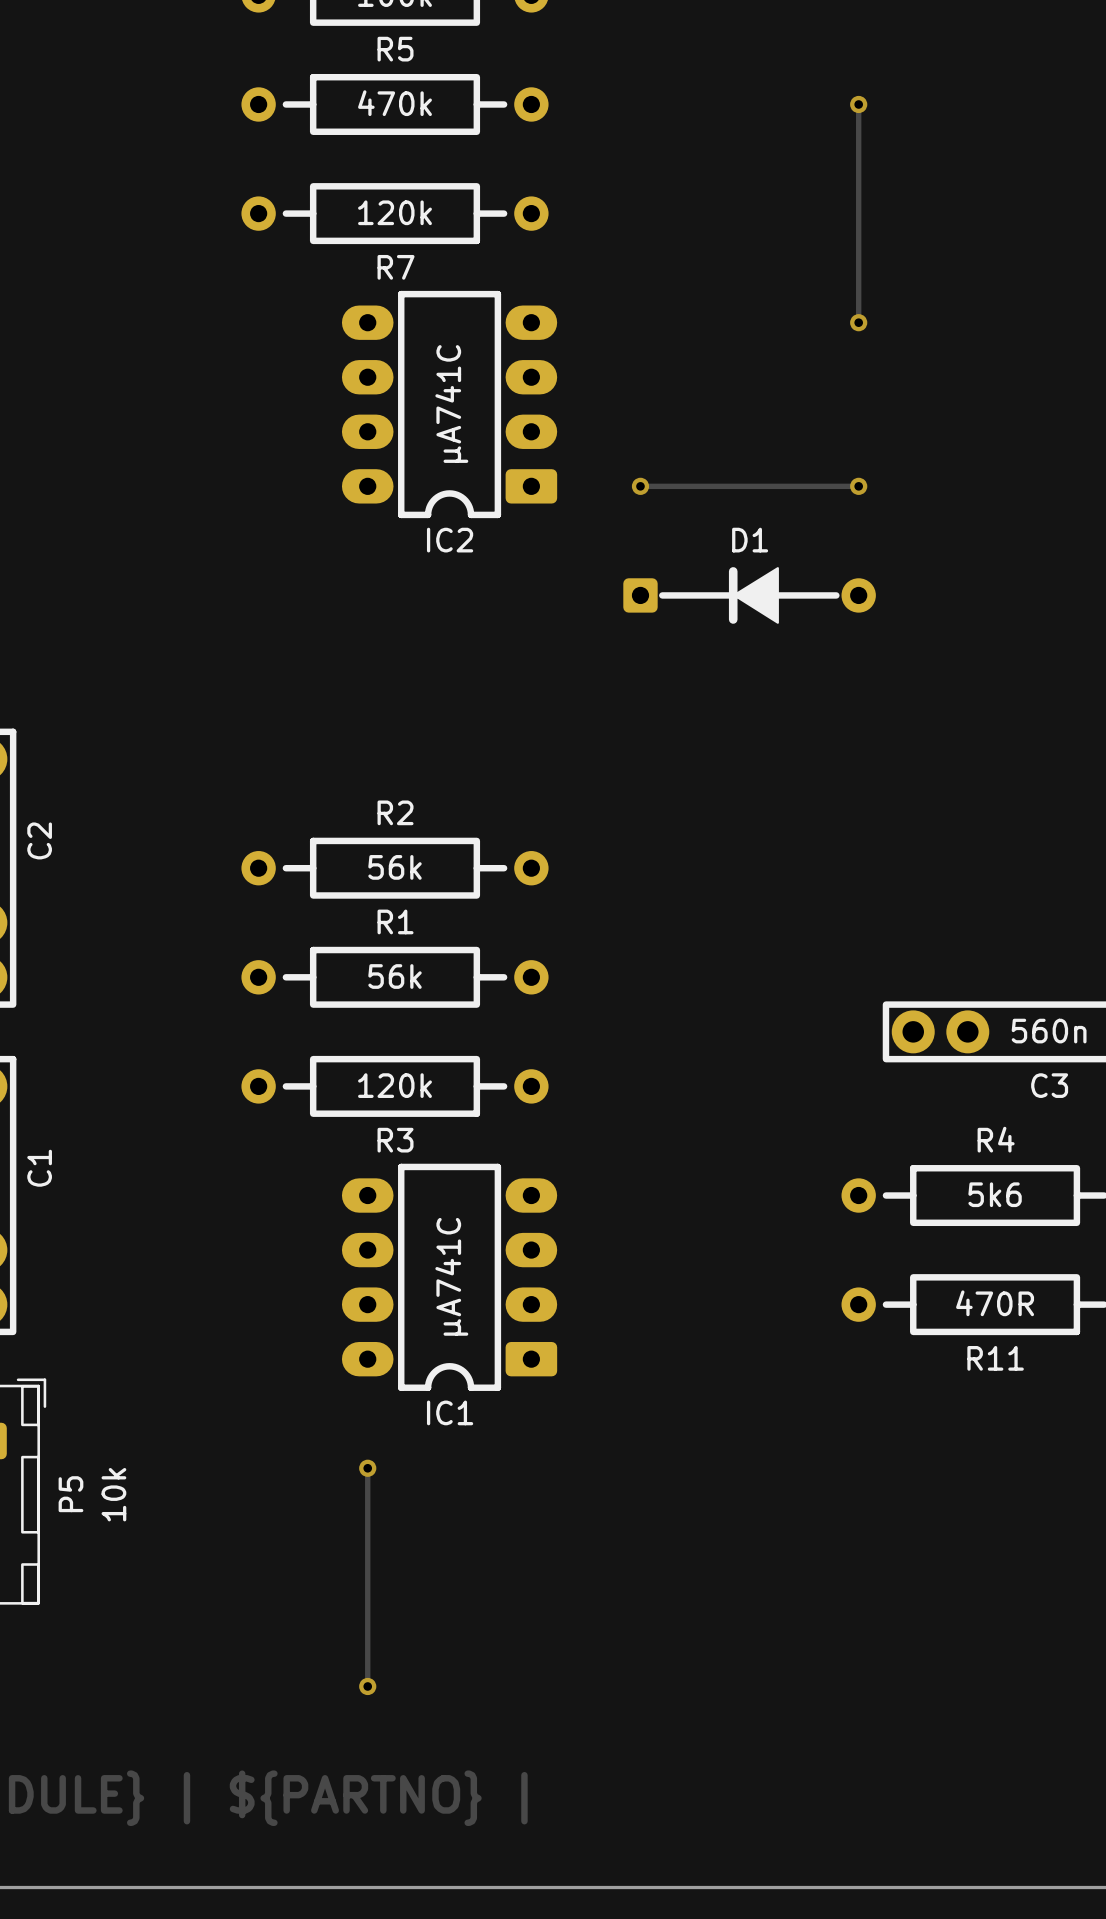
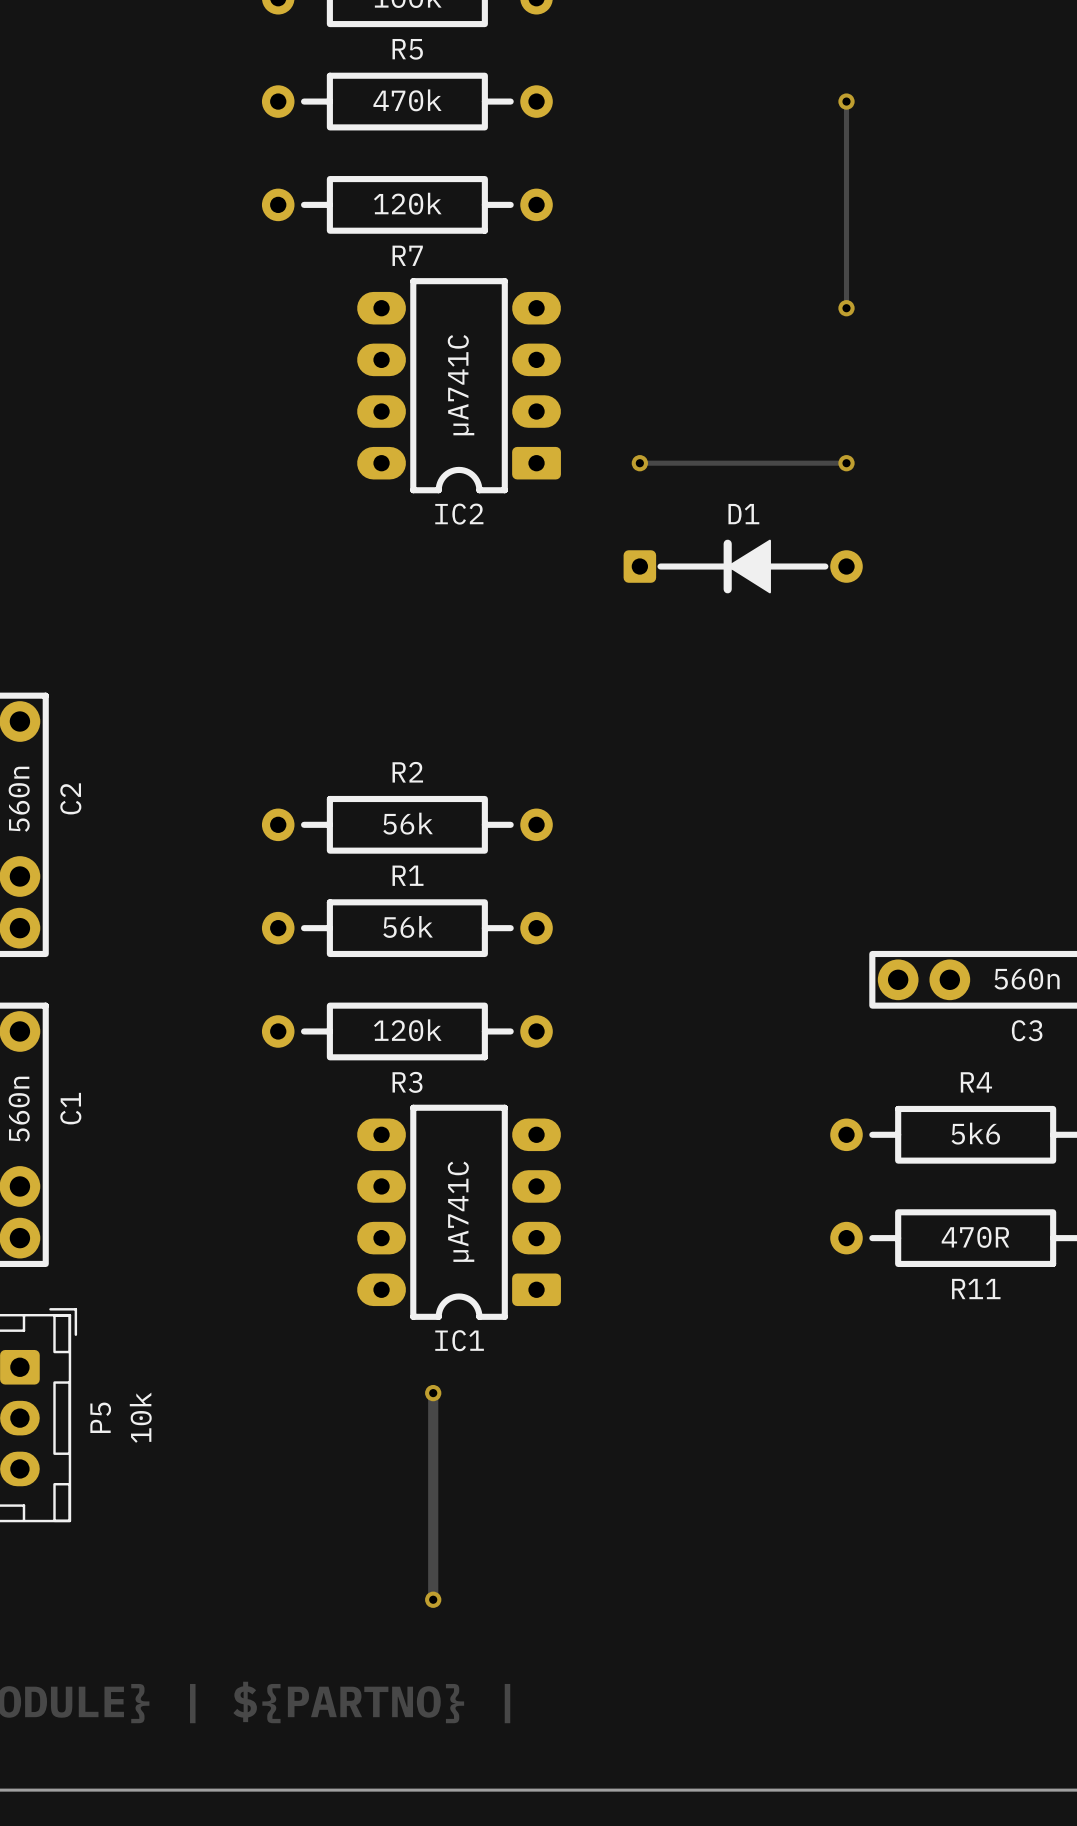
track: (367, 1468) (367, 1686) -> (433, 1393) (433, 1599)
via position: (367, 1468) -> (433, 1393)
via position: (367, 1686) -> (433, 1599)

